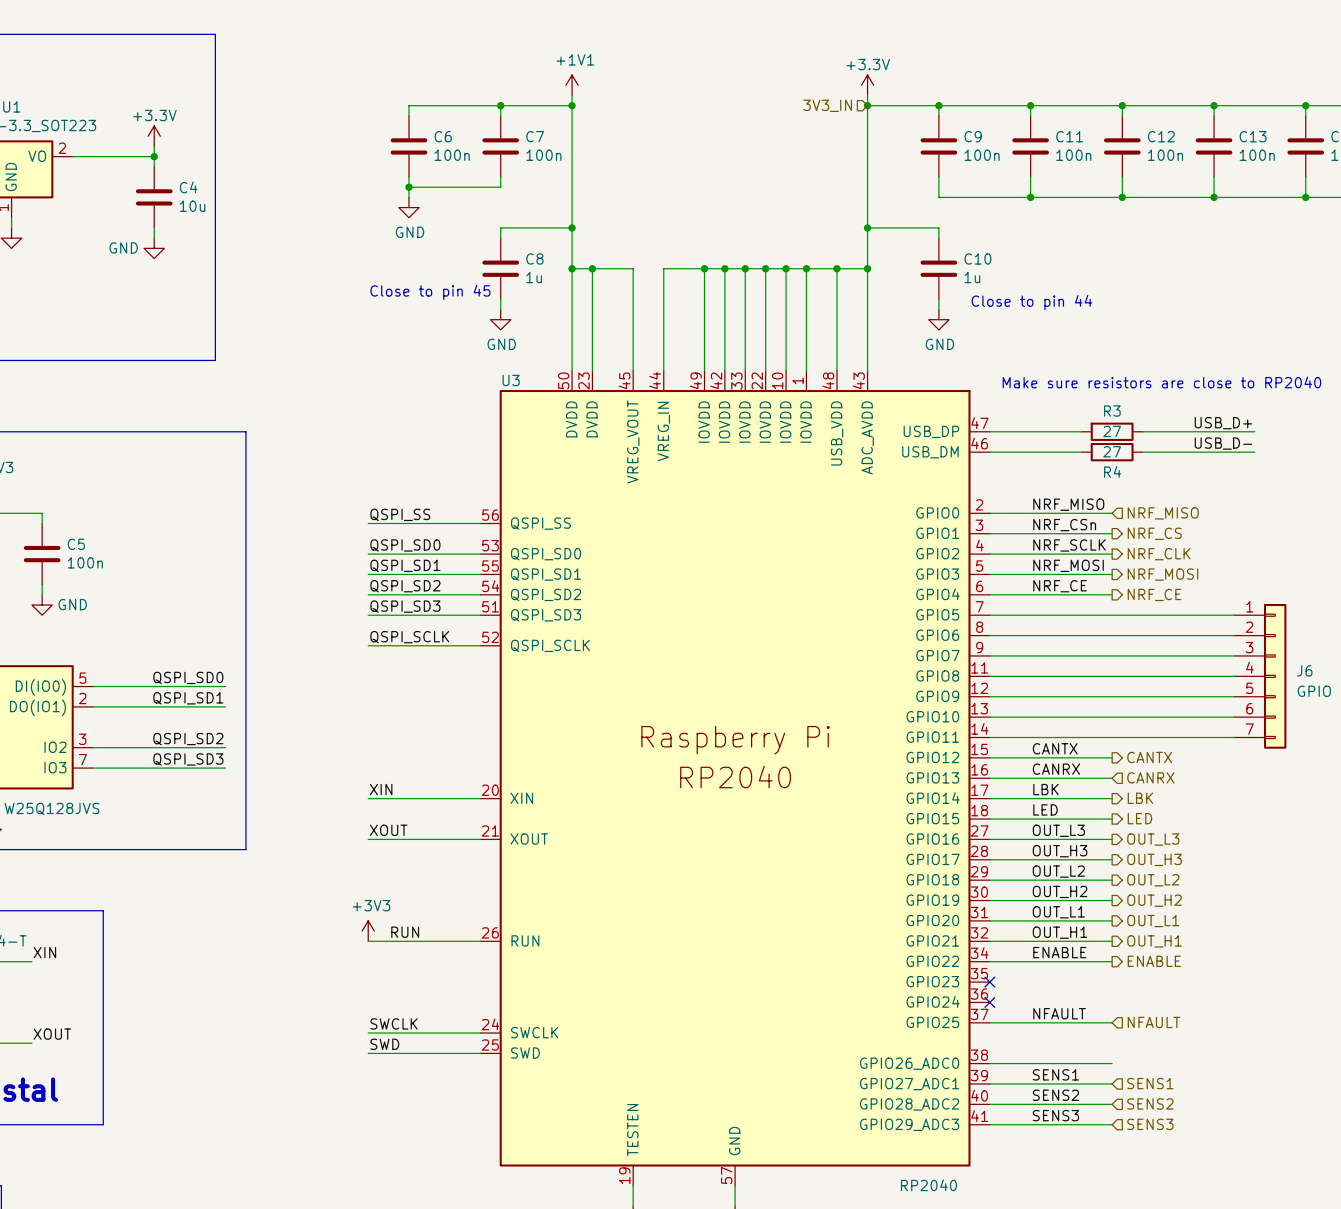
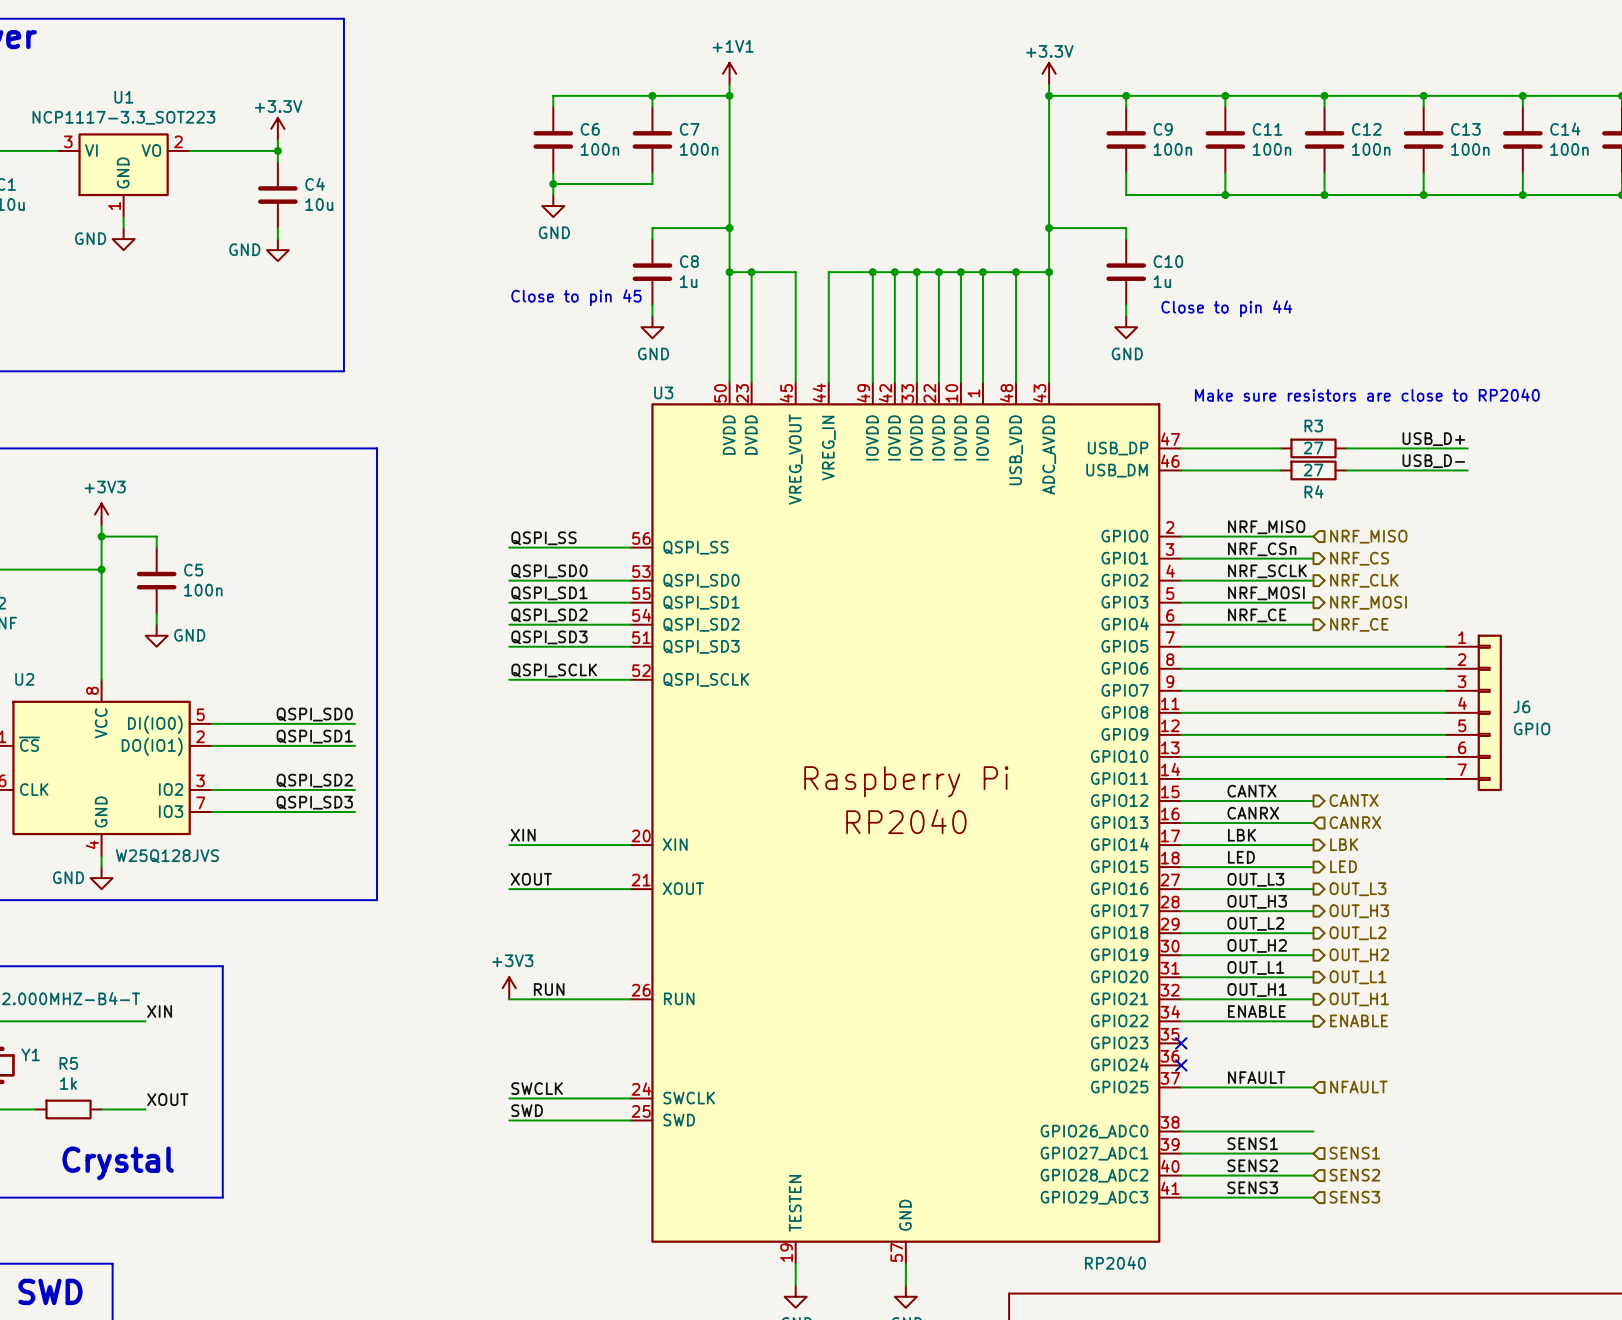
hierarchical label: 3V3_IN (827, 105) -> none

